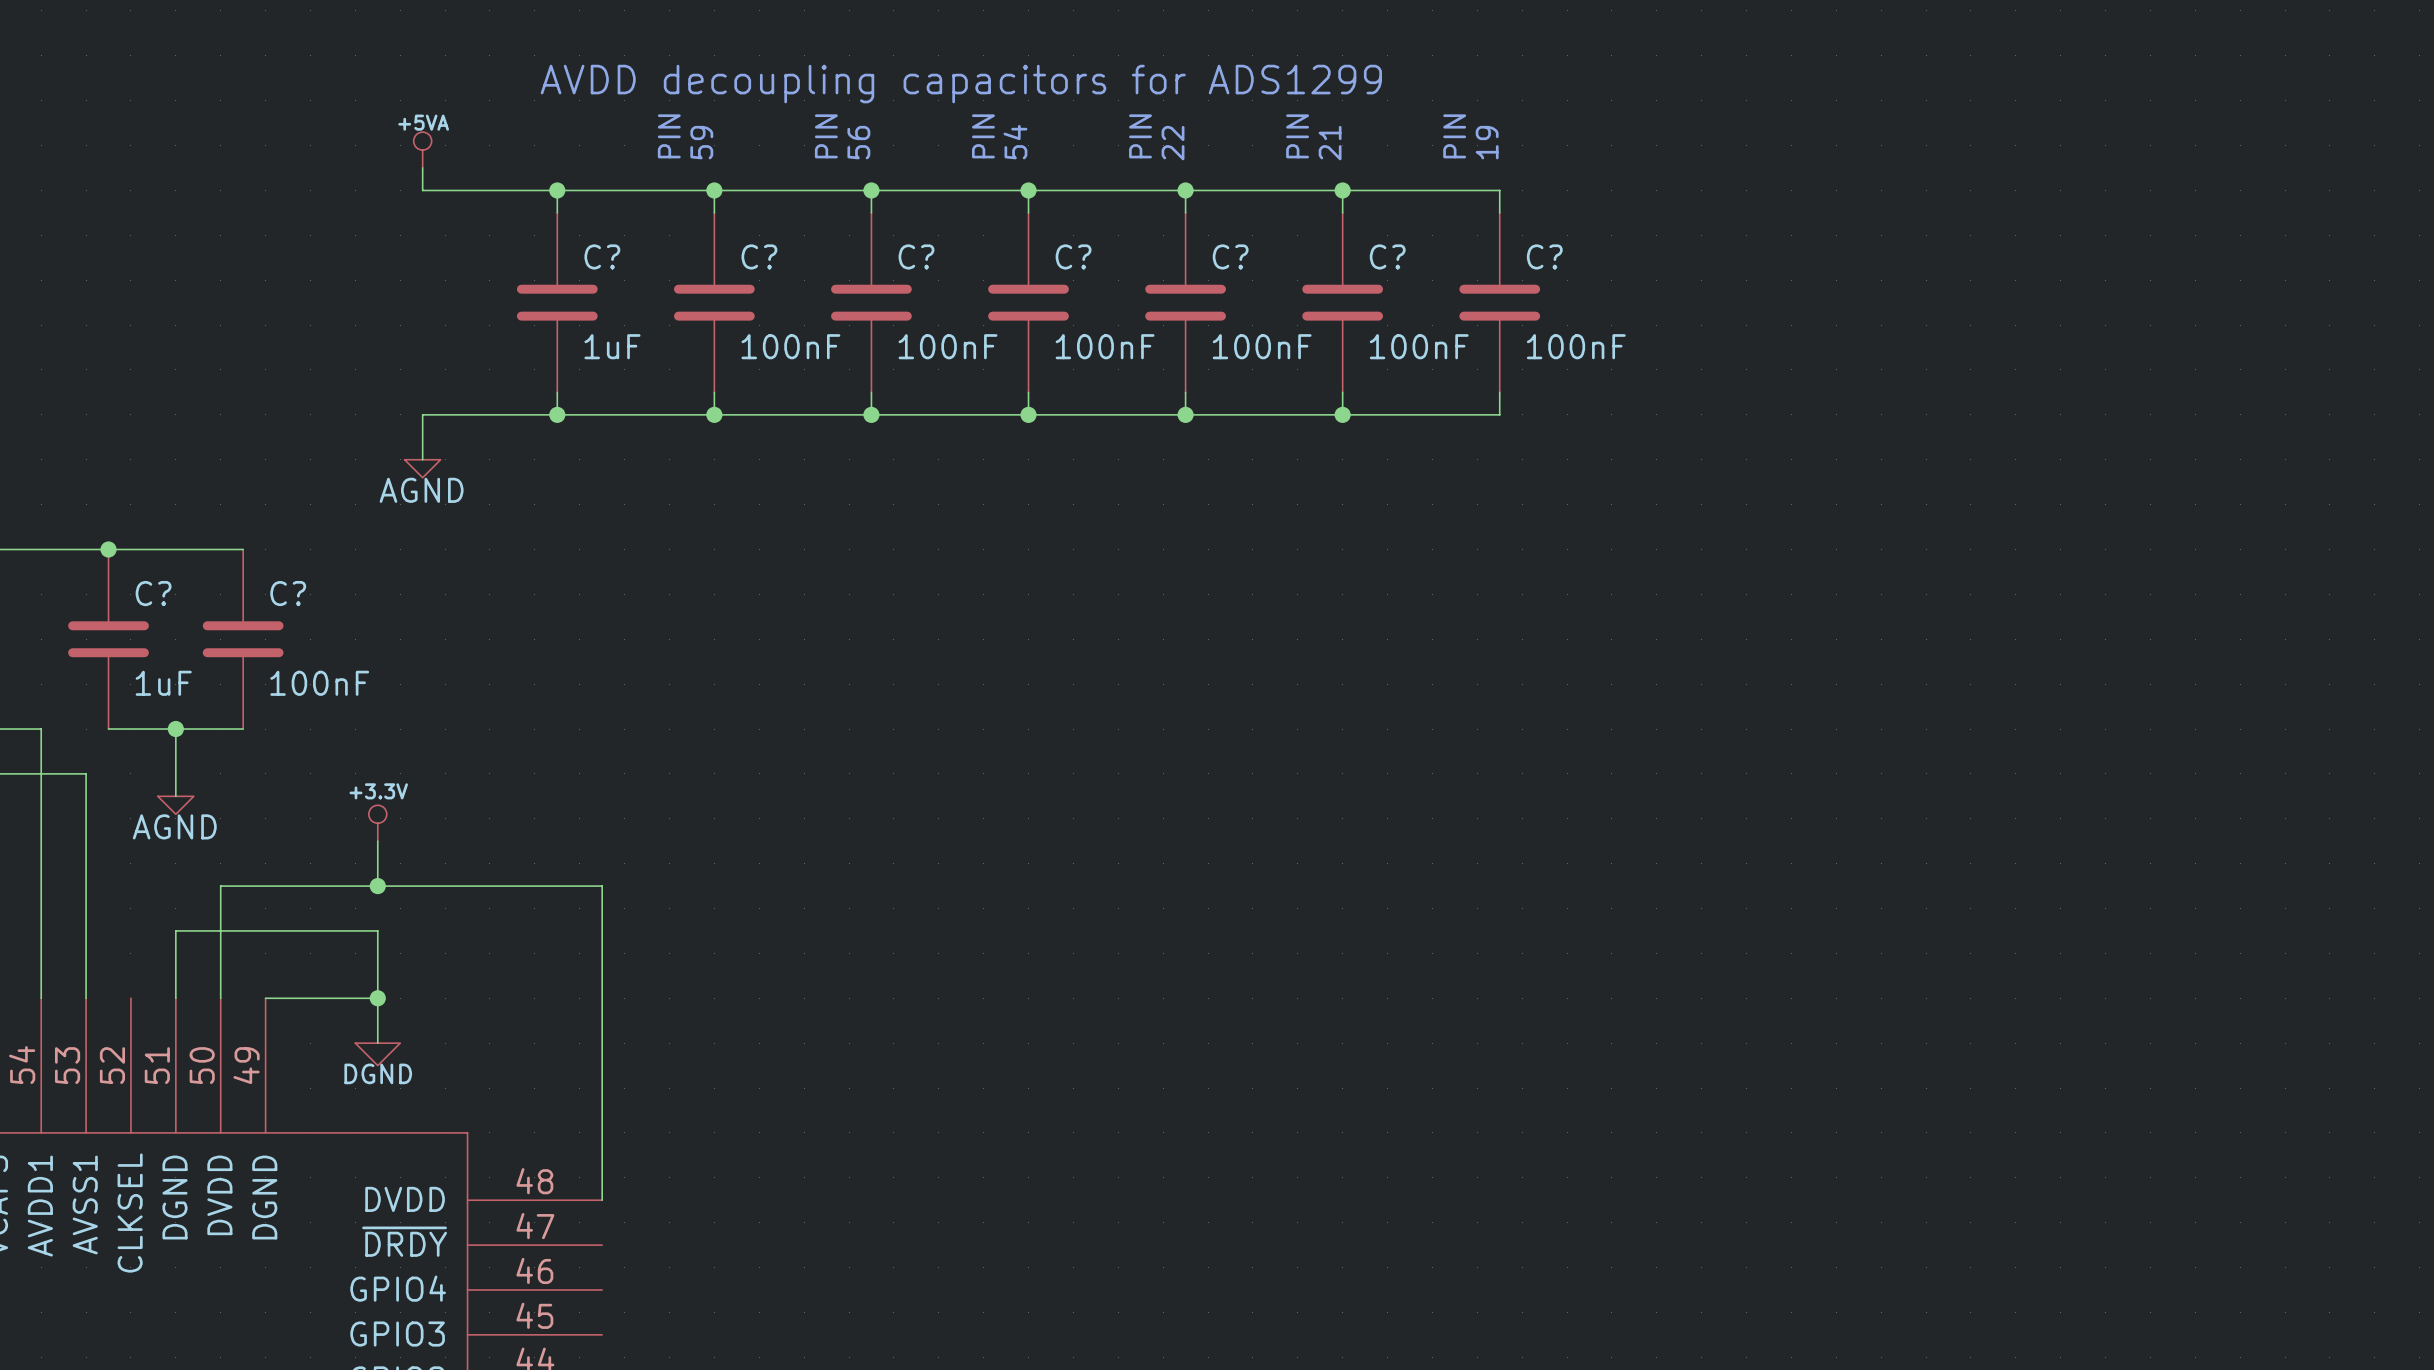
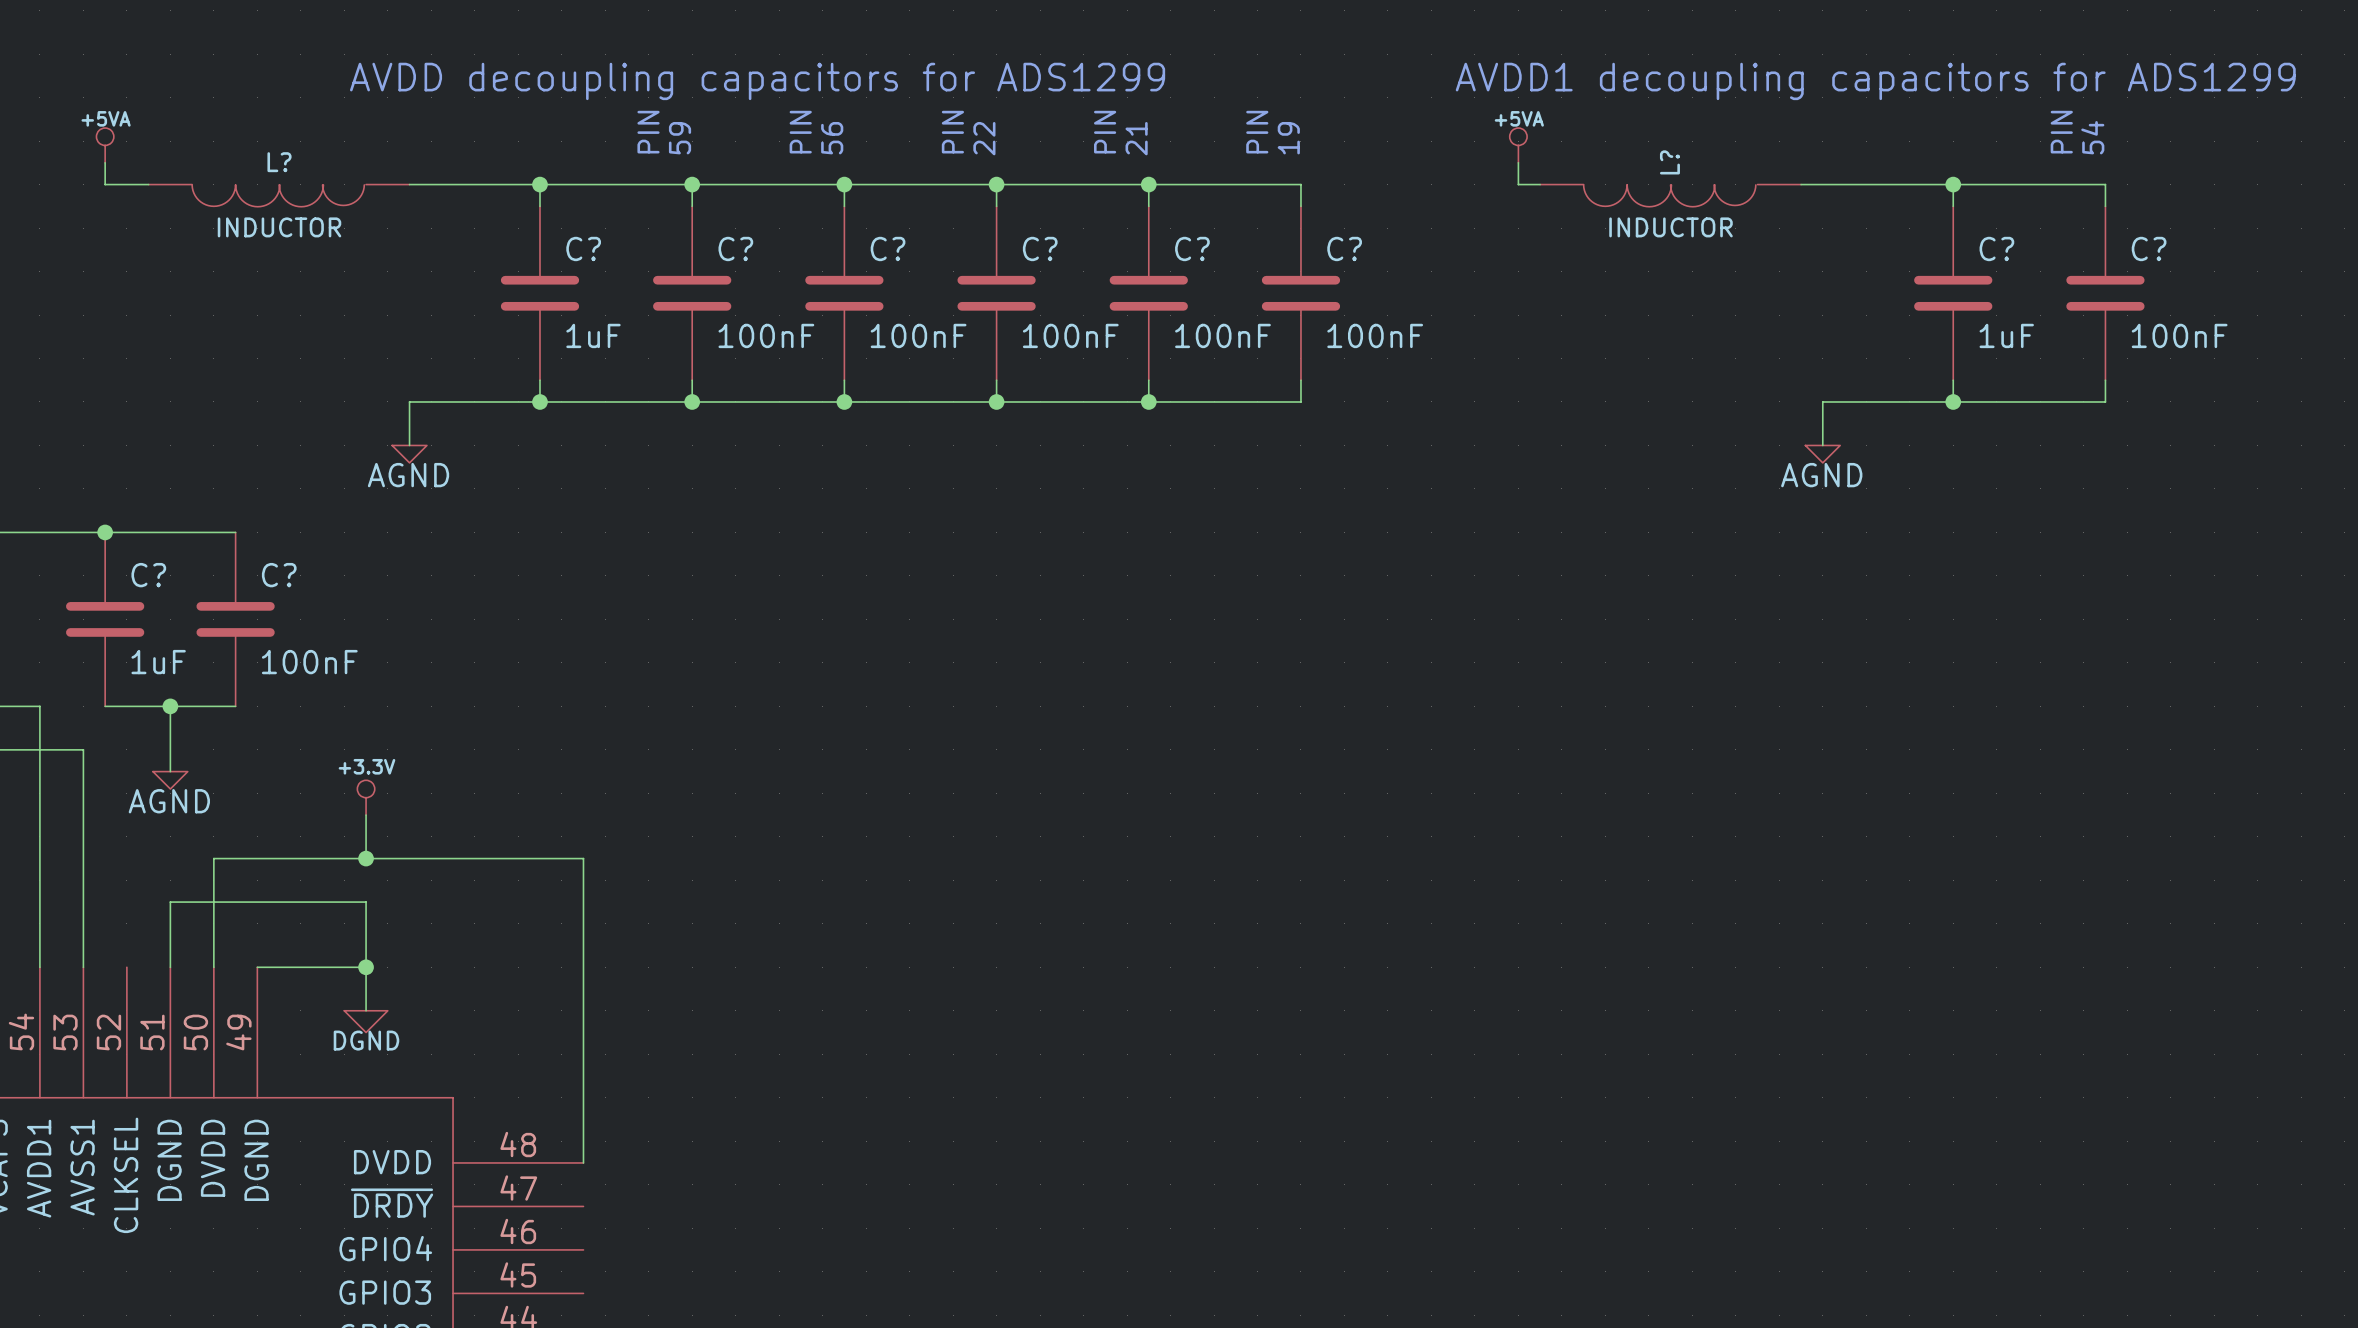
text position: AVDD decoupling capacitors for ADS1299 (961, 84) -> AVDD decoupling capacitors for ADS1299 (757, 81)
text: none -> AVDD1 decoupling capacitors for ADS1299 (1875, 81)
text: PIN (1454, 136) -> none
text: none -> PIN (2061, 132)
text: 54 (1015, 142) -> 22 (984, 138)
text: 19 (1487, 142) -> none
text: none -> 54 (2092, 137)
text: 22 (1173, 143) -> 21 (1136, 138)
text: 21 (1330, 143) -> 19 (1288, 138)
power symbol position: +5VA (422, 150) -> +5VA (105, 145)
power symbol: none -> +5VA (1518, 145)
wire: none -> (105, 162) (105, 184) (148, 184)
wire: (422, 168) (422, 190) -> none
wire: none -> (1518, 162) (1518, 184) (1540, 184)
wire: (1342, 190) (1499, 190) (1499, 212) -> none
junction: (1342, 190) -> none
wire: none -> (1801, 184) (2105, 184) (2105, 206)
wire: none -> (1953, 184) (1953, 206)
junction: none -> (1953, 184)
L?: none -> INDUCTOR (279, 195)
L?: none -> INDUCTOR (1670, 195)
C?: 100nF (1499, 302) -> none
C?: none -> 1uF (1953, 293)
C?: none -> 100nF (2105, 293)
wire: (1499, 392) (1499, 414) (1342, 414) -> none
wire: none -> (1953, 380) (1953, 401)
wire: none -> (2105, 380) (2105, 401) (1822, 401) (1822, 445)
junction: (1342, 414) -> none
junction: none -> (1953, 401)
power symbol: none -> AGND (1822, 454)

